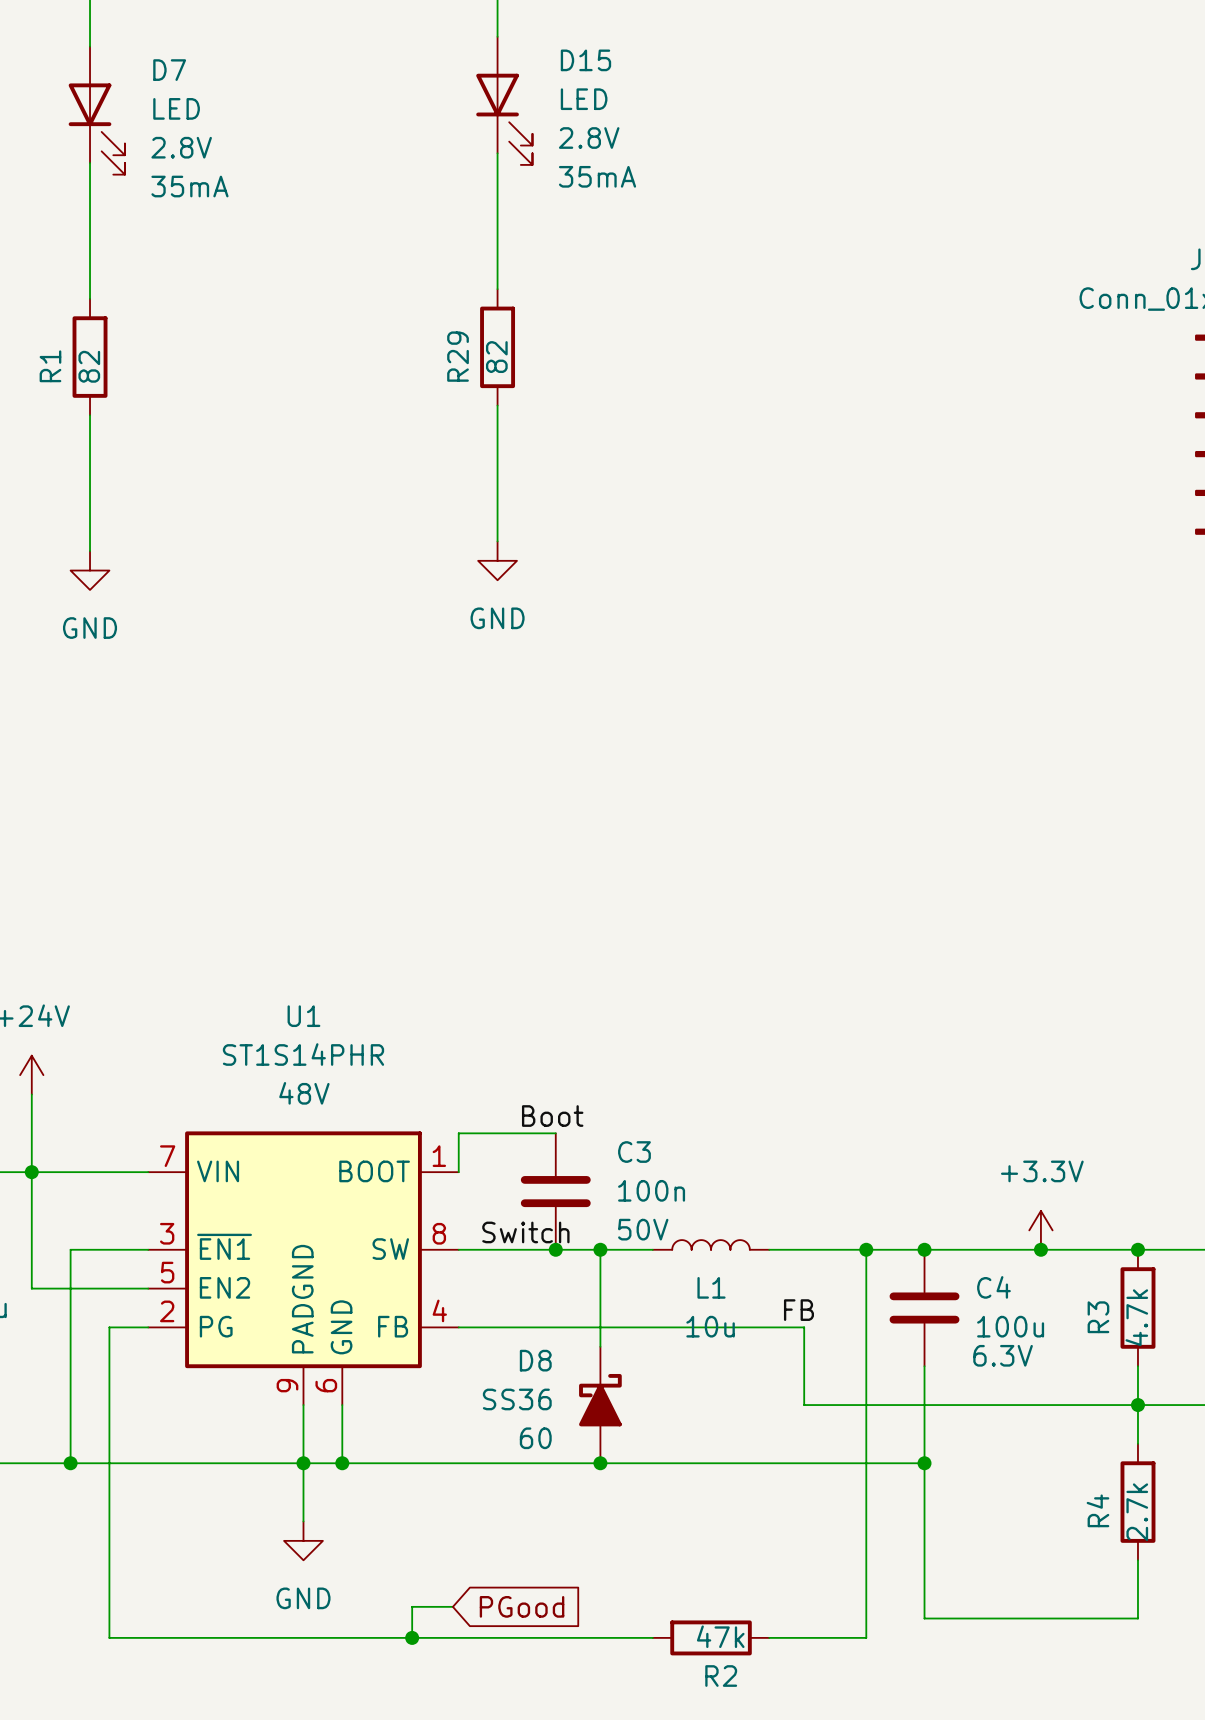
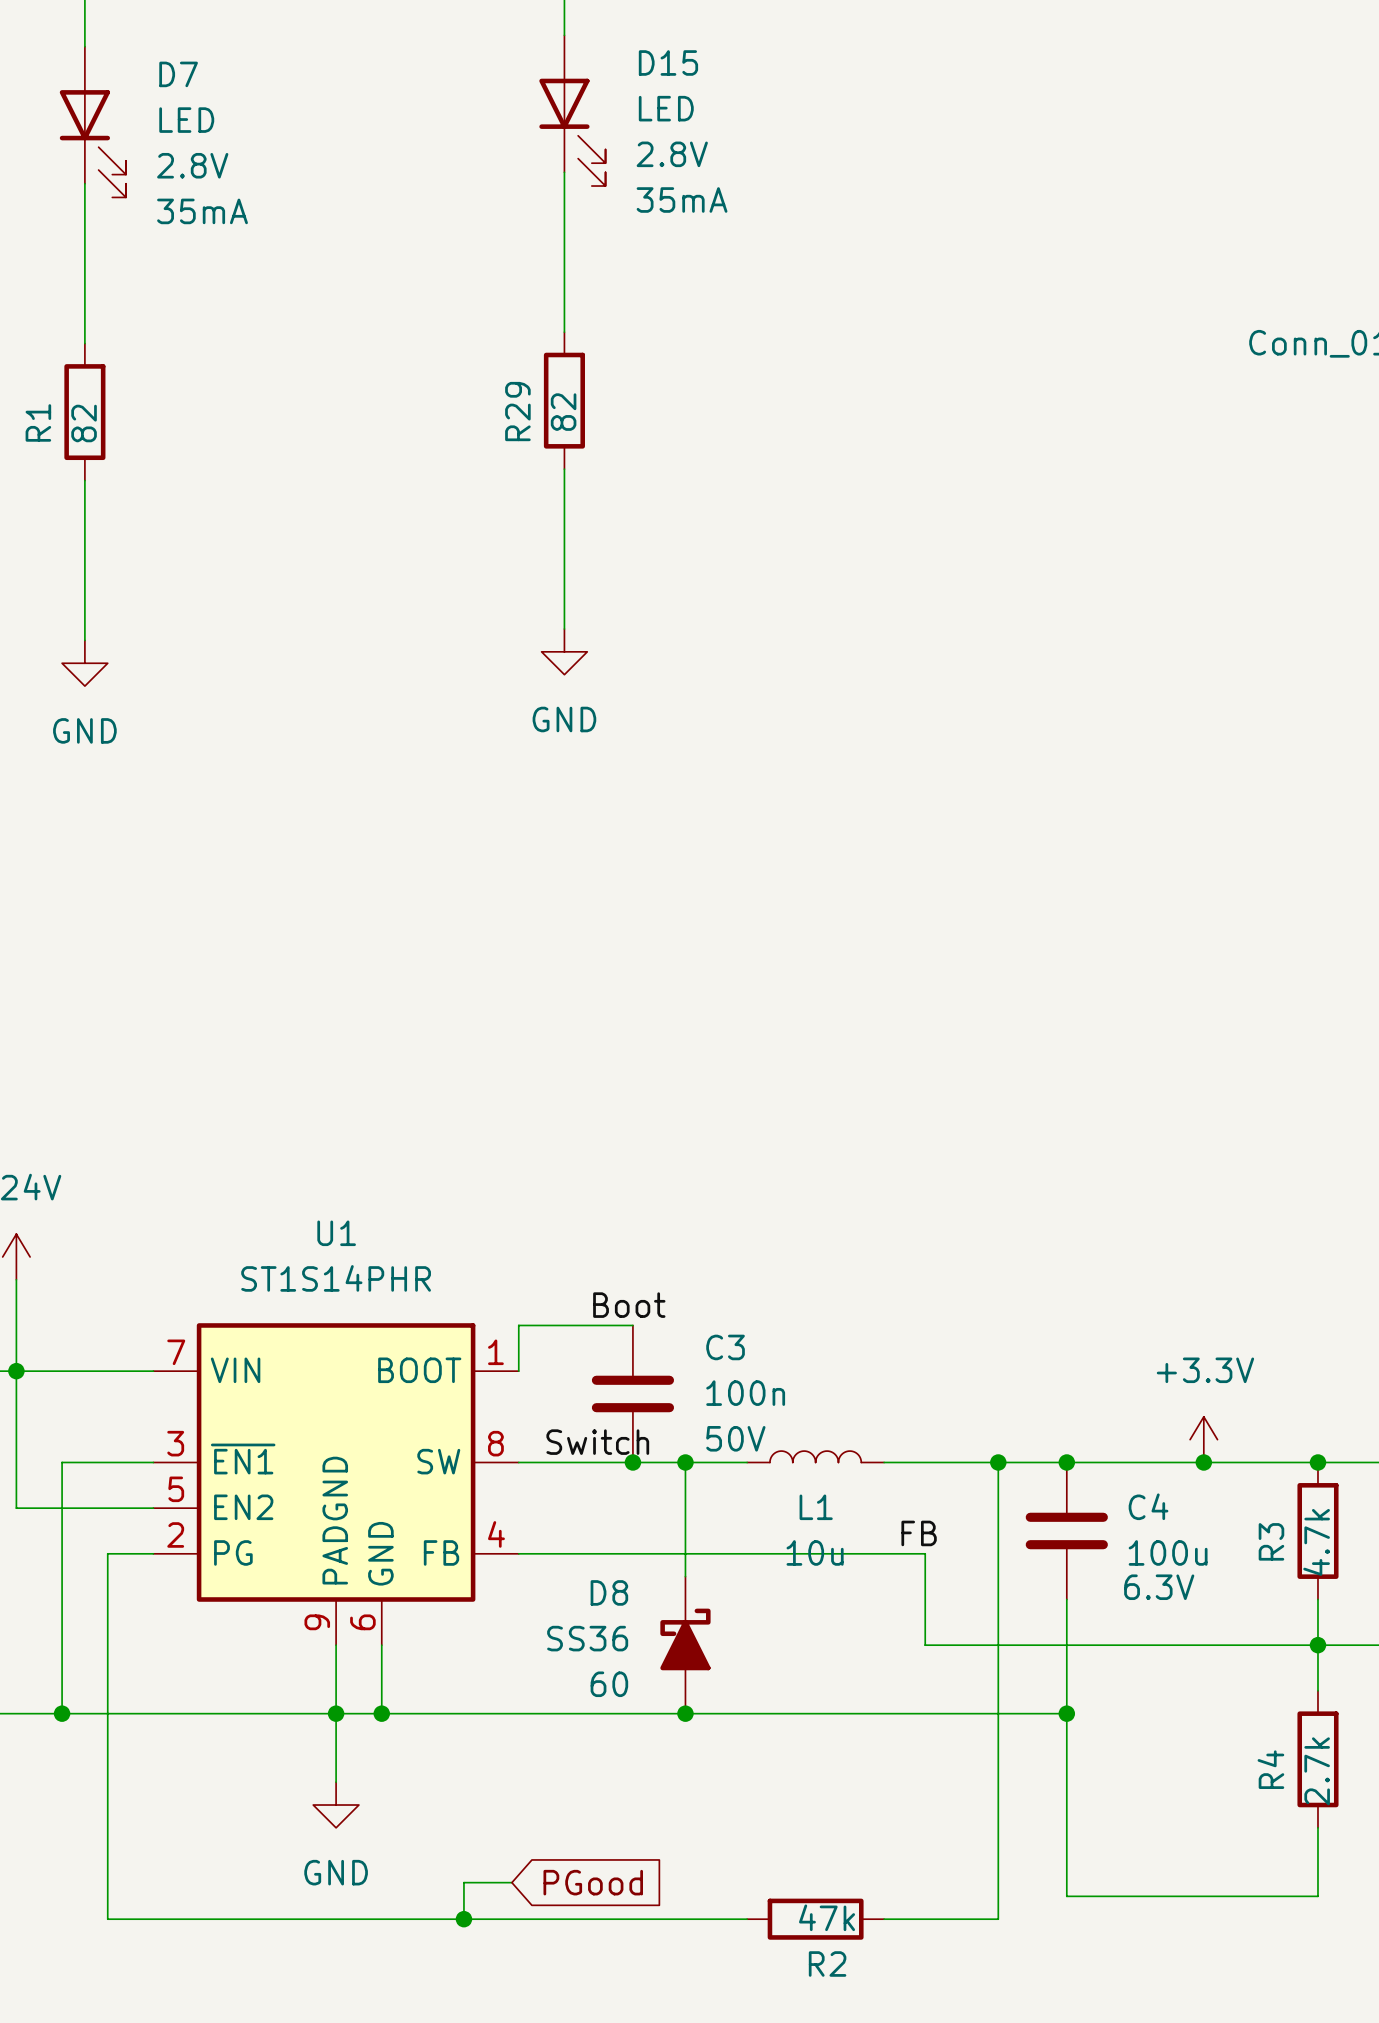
U1 name position: U1 (303, 1016) -> U1 (336, 1233)
U1 value position: ST1S14PHR (303, 1054) -> ST1S14PHR (336, 1278)
U1 text: 48V (304, 1093) -> none

